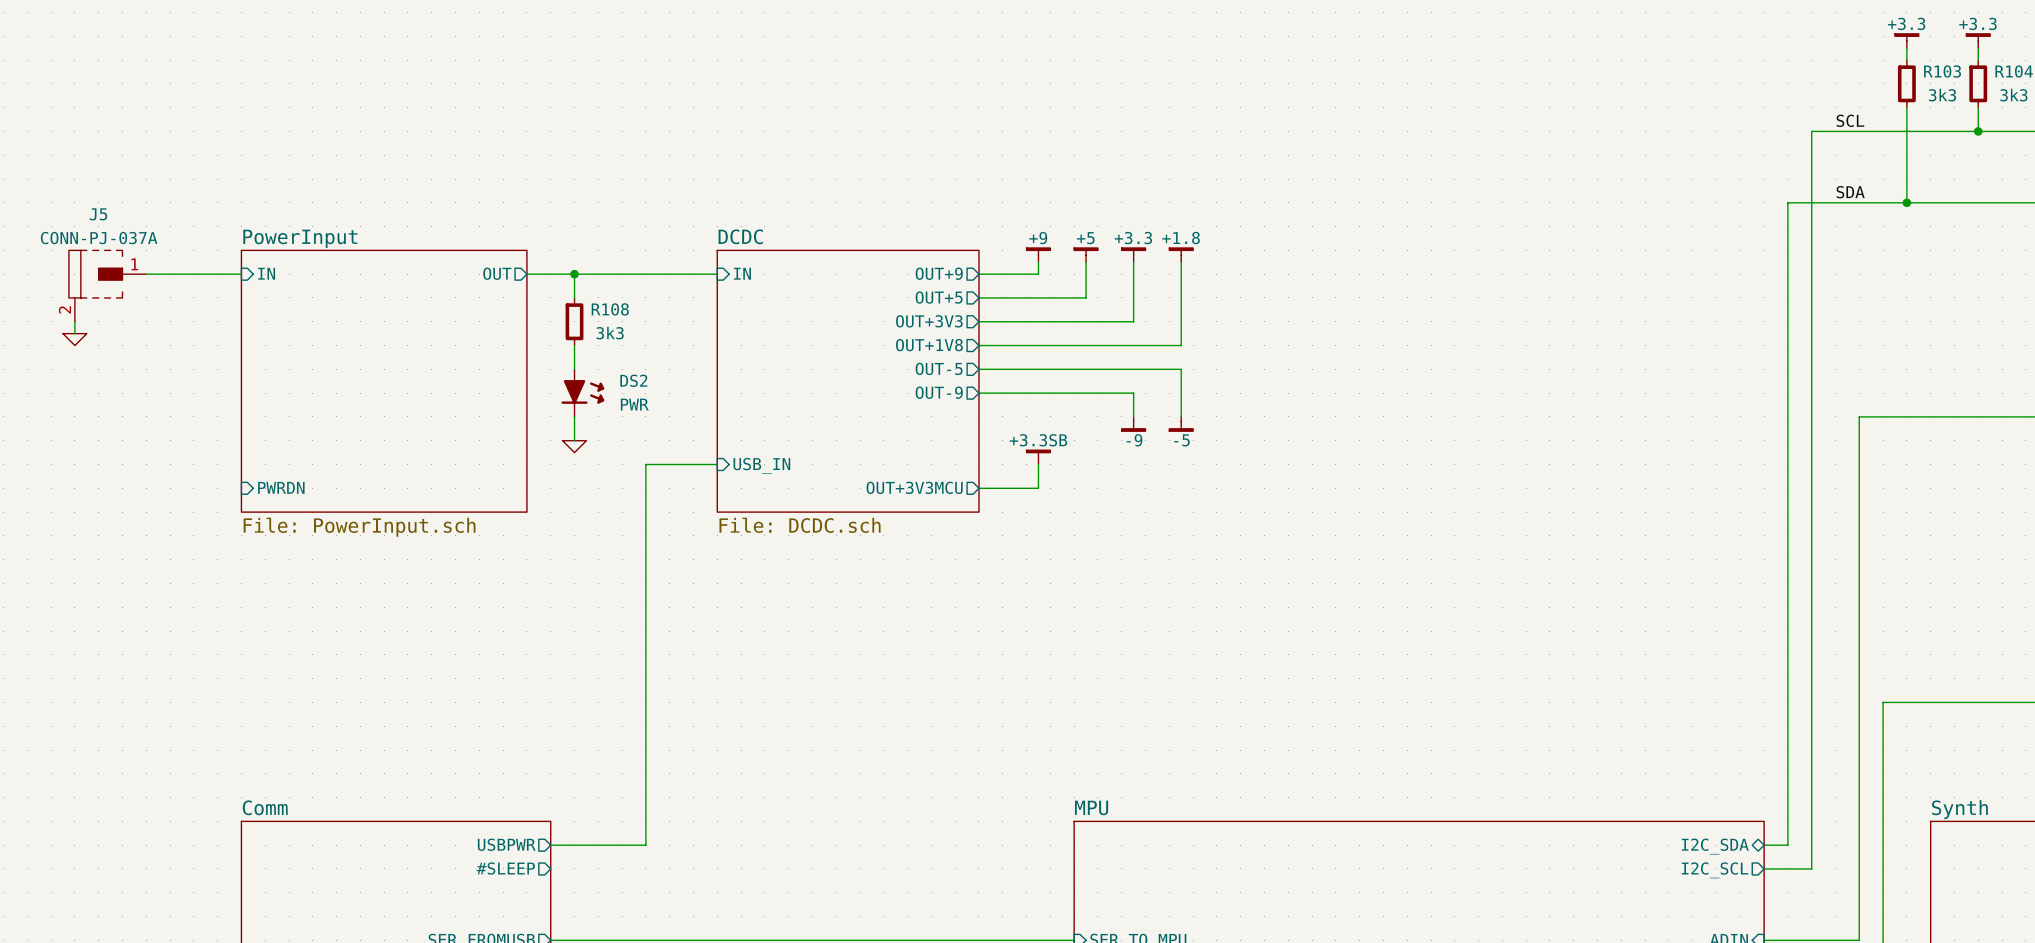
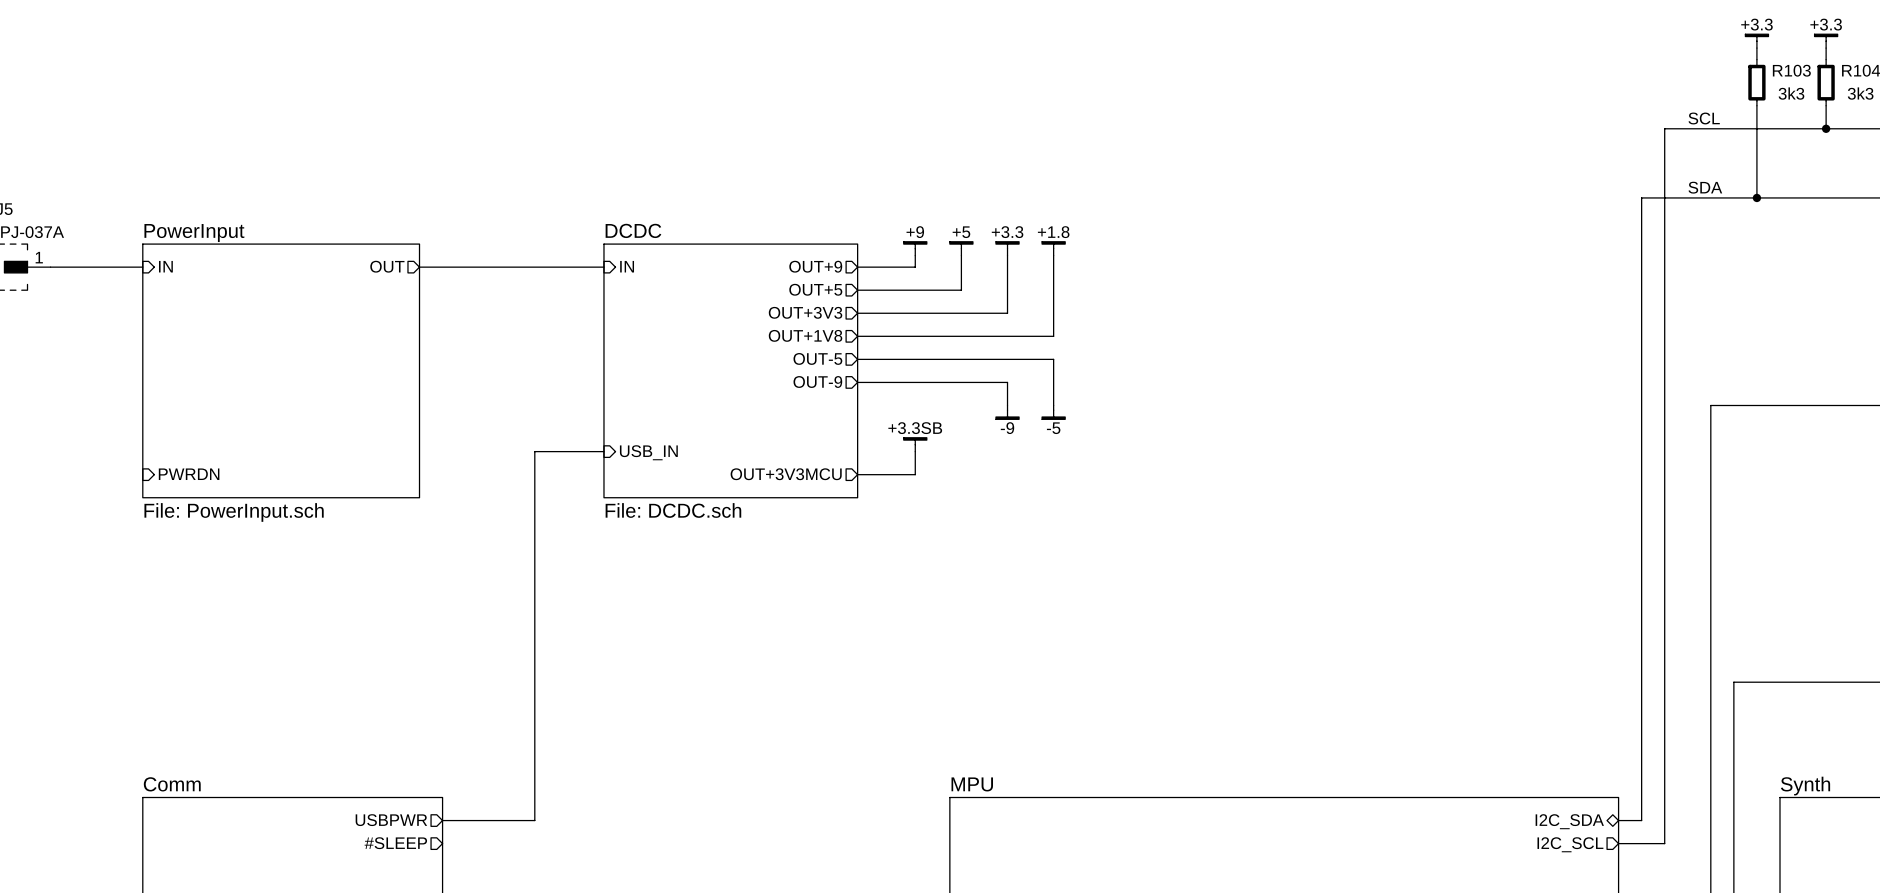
wire: (574, 274) (574, 297) -> none
junction: (574, 274) -> none
R108: 3k3 (574, 321) -> none
wire: (574, 345) (574, 369) -> none
DS2: PWR (582, 393) -> none
wire: (574, 416) (574, 440) -> none
power symbol: (574, 446) -> none

